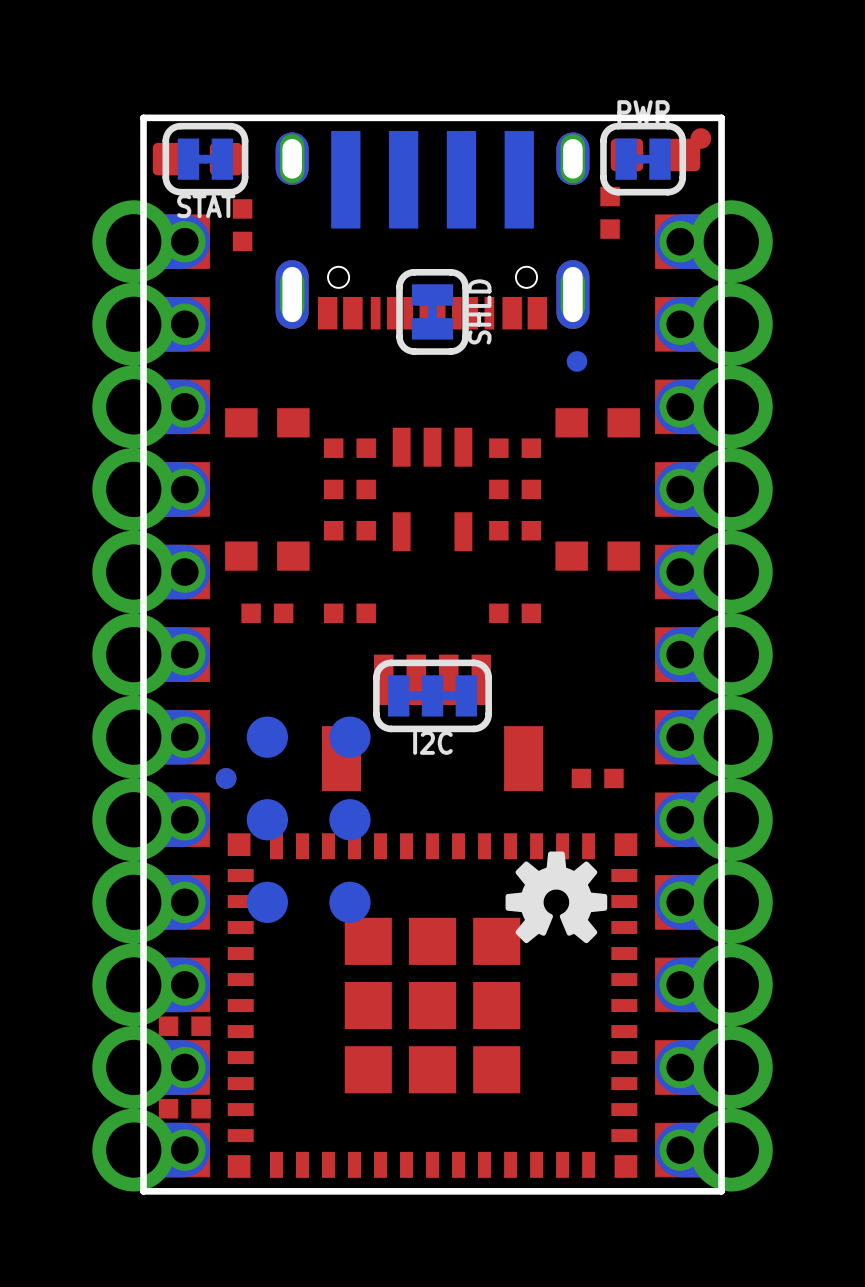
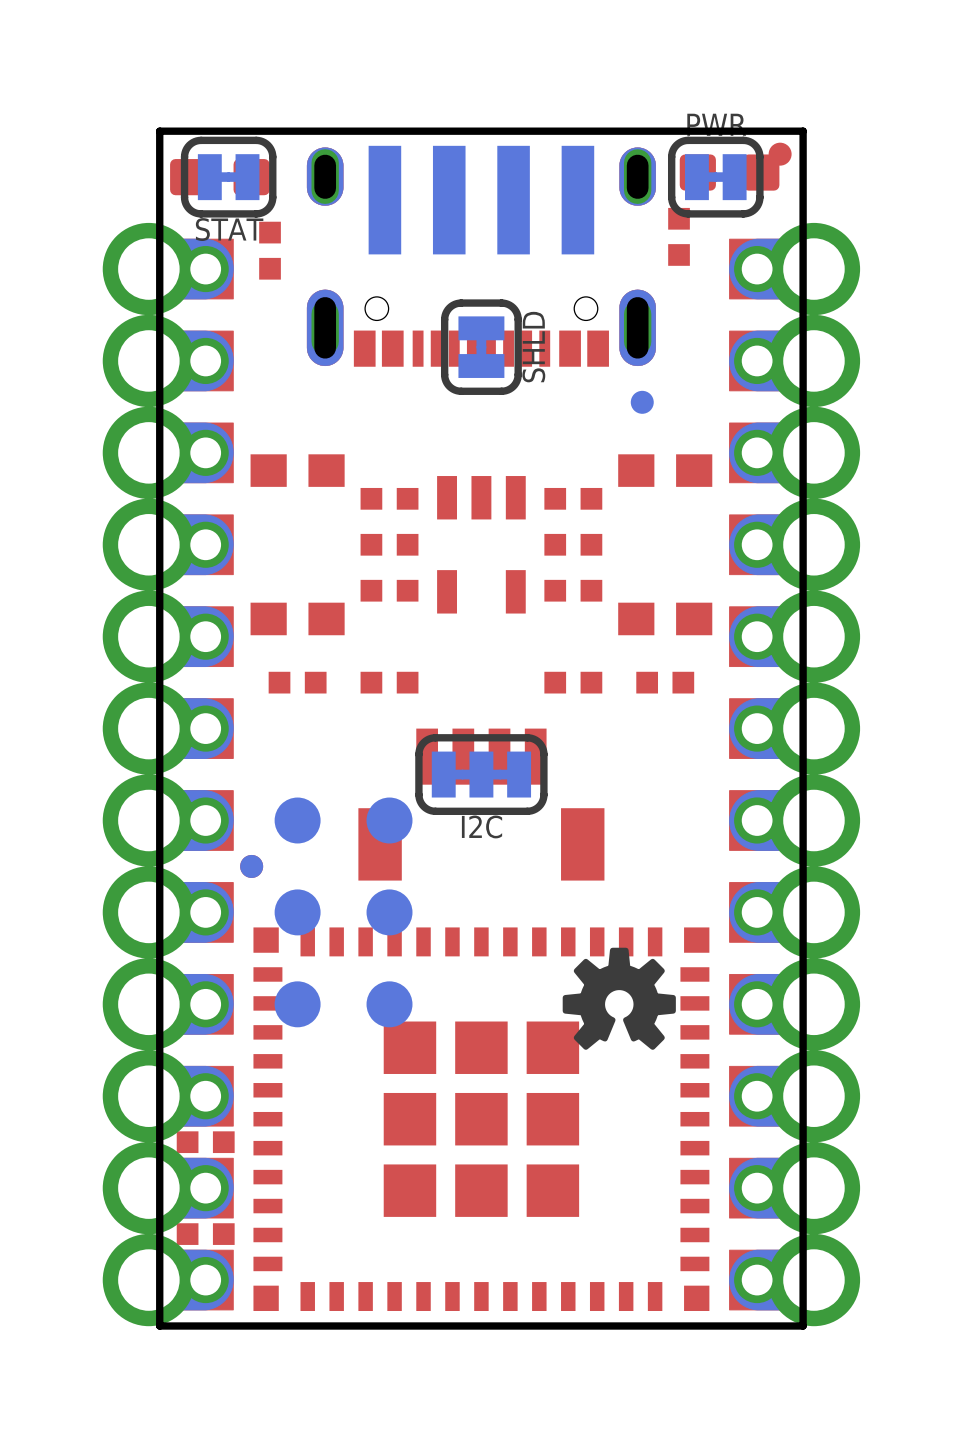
part position: (597, 778) -> (665, 682)

